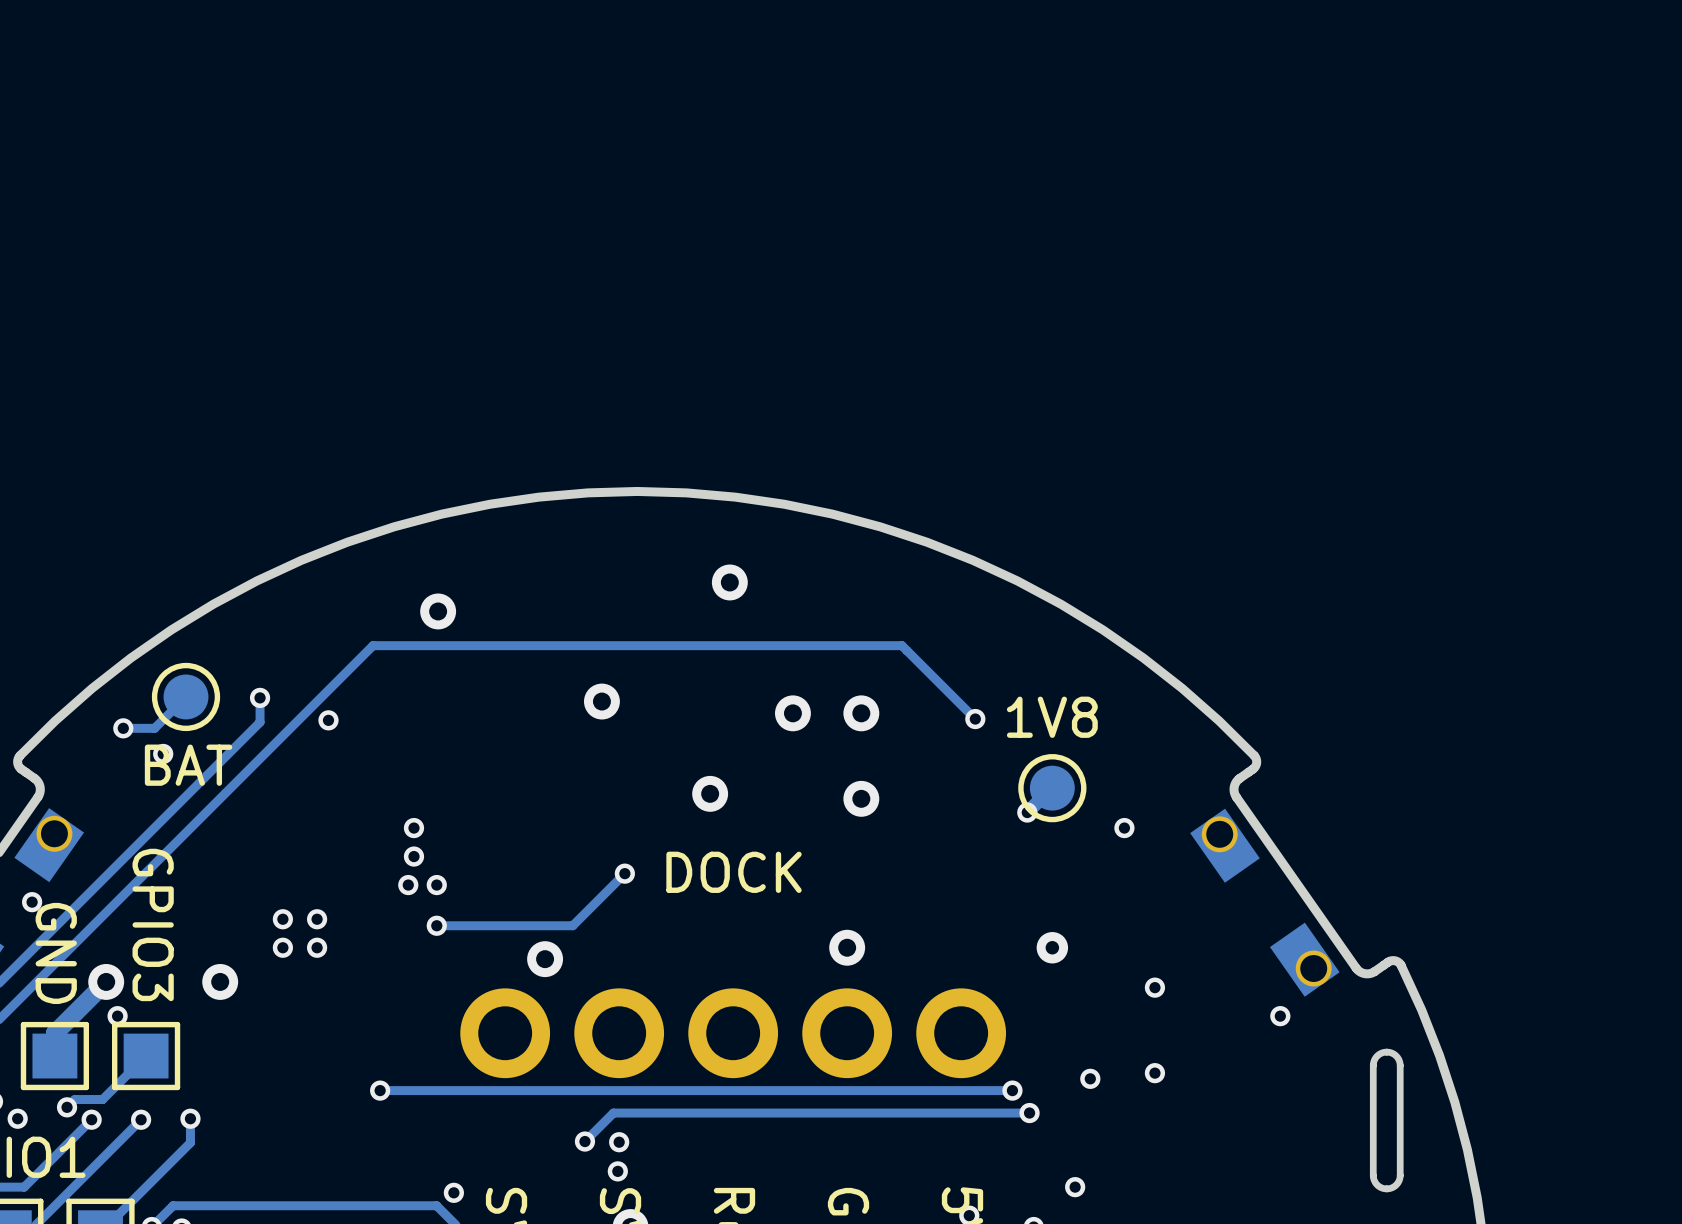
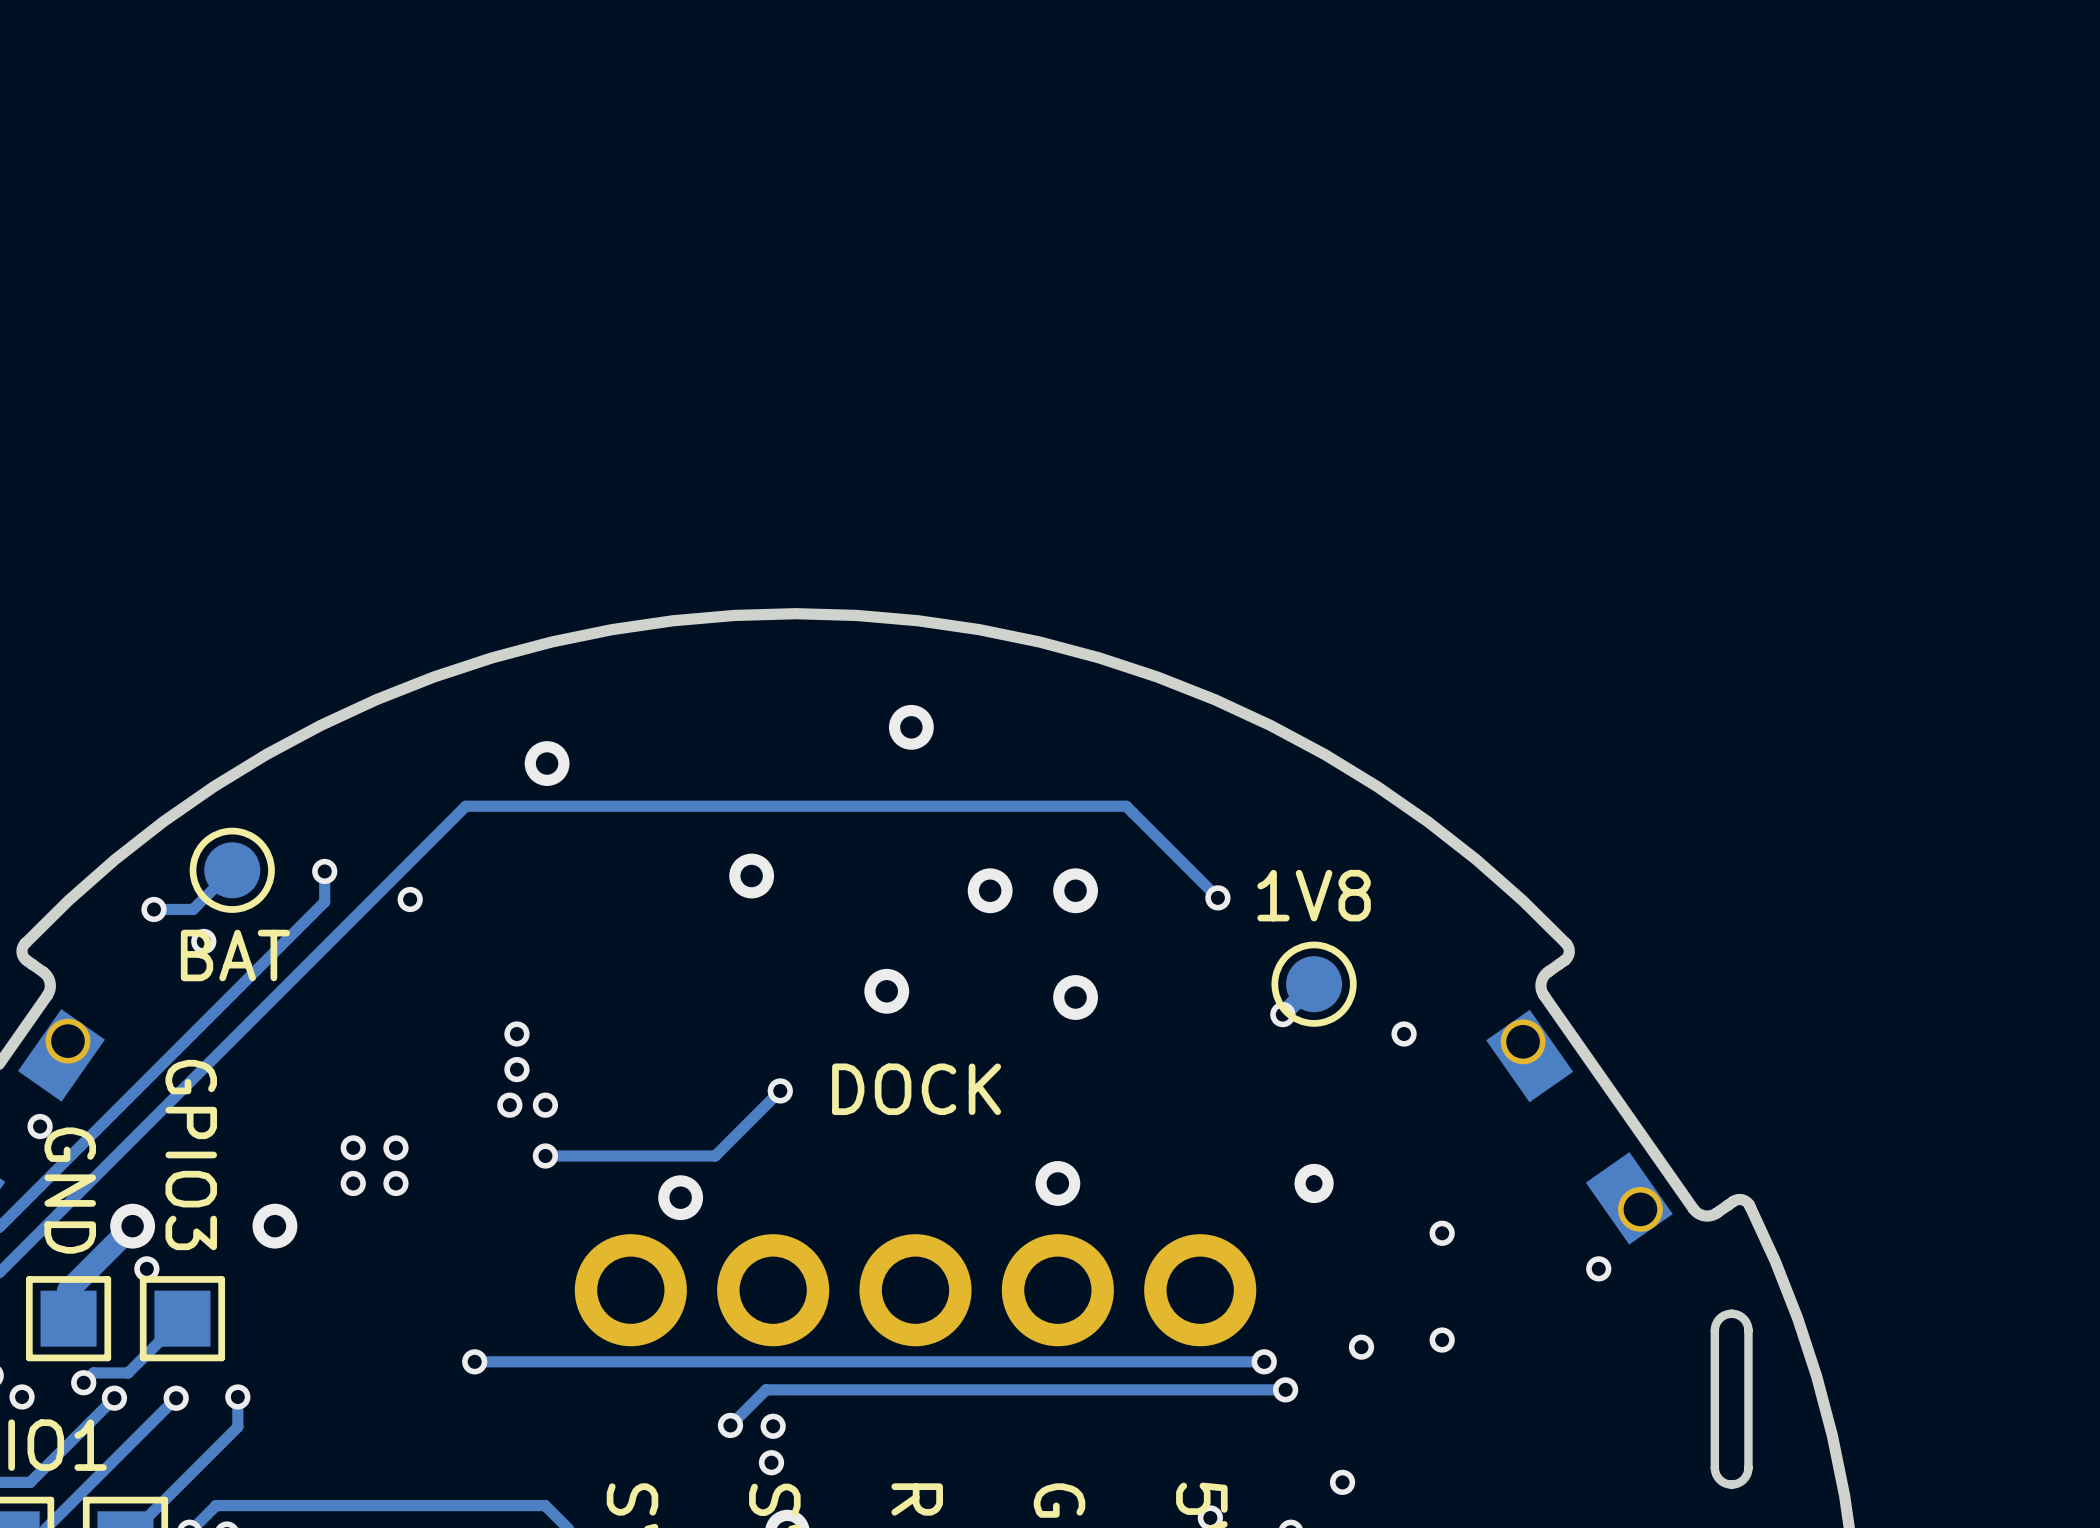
via: (453, 1192) -> none

